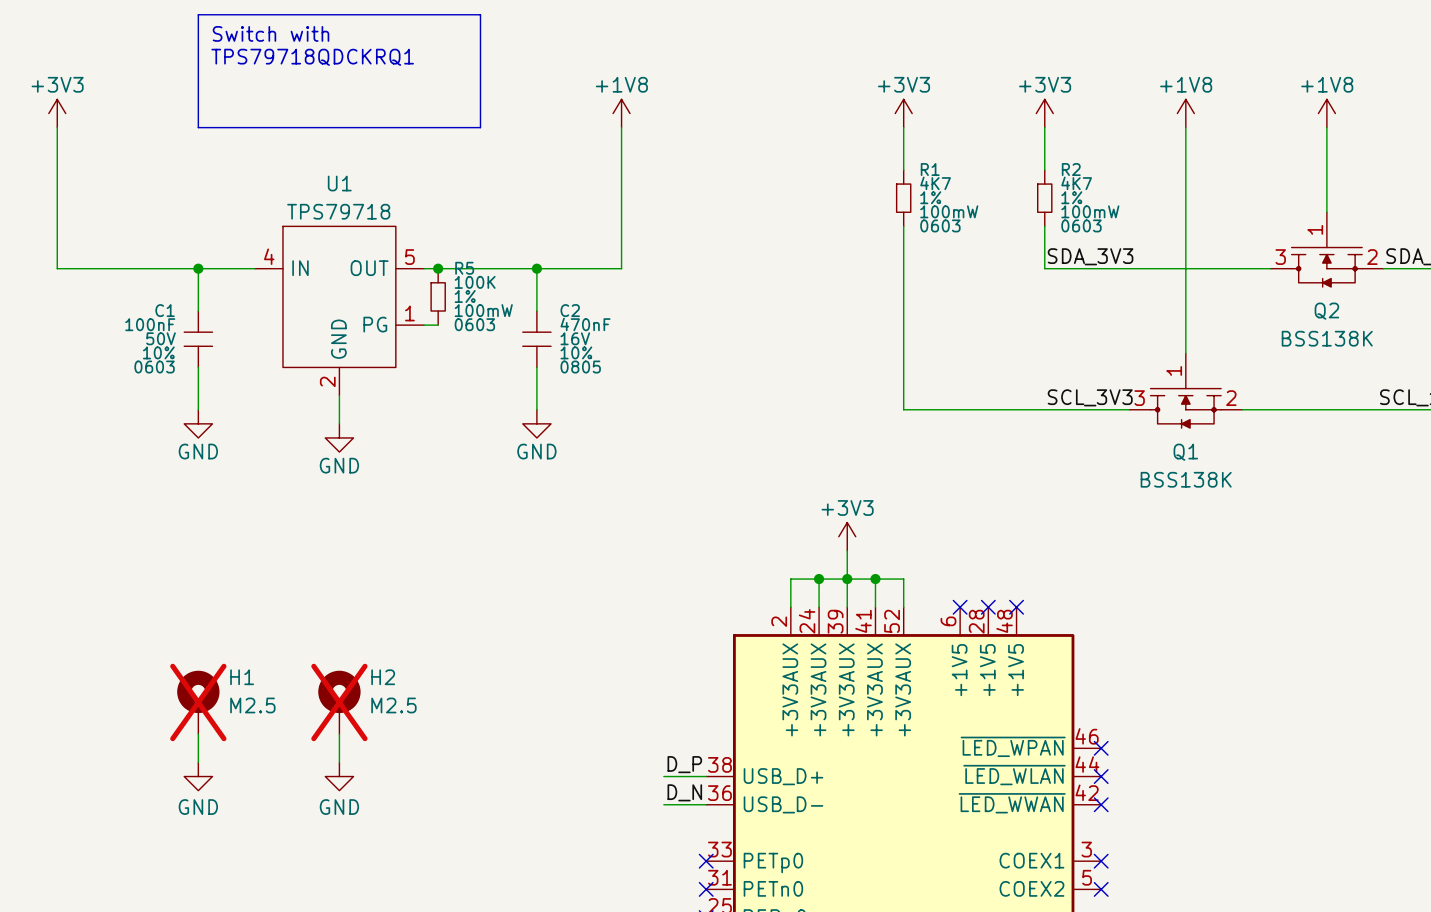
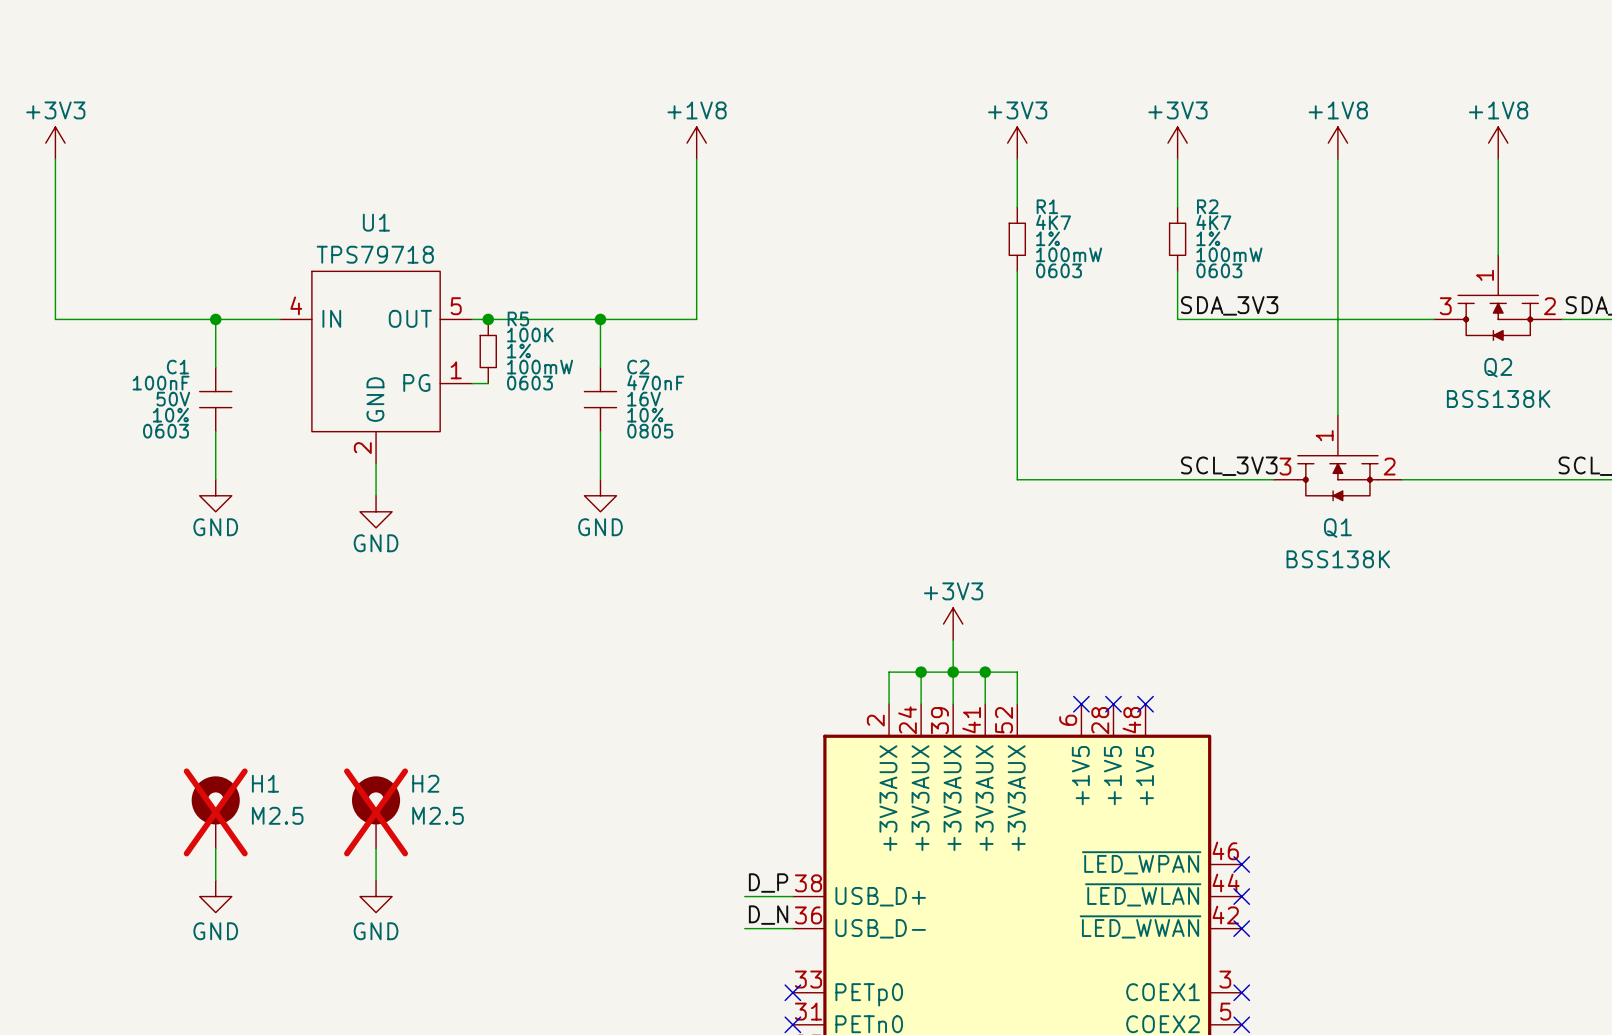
line: (198, 14) (480, 14) (480, 127) (198, 127) (198, 14) -> none
text: Switch with (271, 33) -> none
text: TPS79718QDCKRQ1 (312, 57) -> none

